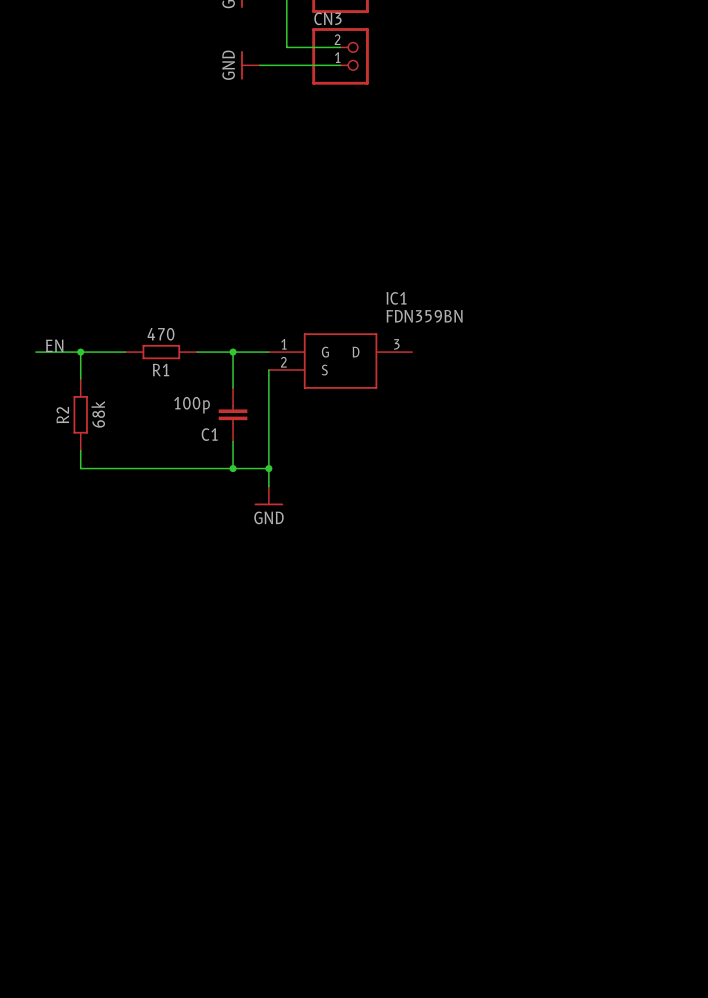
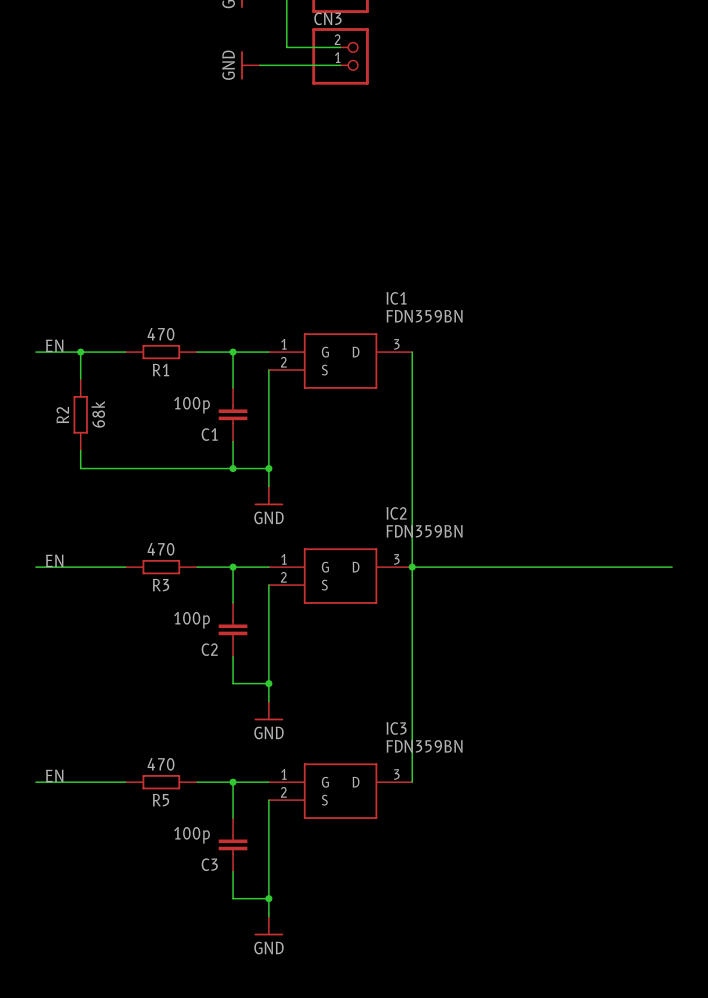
wire: none -> (412, 352) (412, 782)
label: none -> EN (54, 560)
wire: none -> (35, 567) (125, 567)
R3: none -> 470 (161, 567)
wire: none -> (197, 567) (268, 567)
wire: none -> (233, 567) (233, 602)
junction: none -> (233, 567)
wire: none -> (412, 567) (672, 567)
junction: none -> (412, 567)
IC2: none -> FDN359BN (340, 576)
wire: none -> (268, 585) (268, 701)
C2: none -> 100p (233, 629)
wire: none -> (233, 656) (233, 683) (268, 683)
junction: none -> (268, 683)
power symbol: none -> GND (268, 710)
label: none -> EN (54, 775)
wire: none -> (35, 782) (125, 782)
R5: none -> 470 (161, 782)
wire: none -> (197, 782) (268, 782)
wire: none -> (233, 782) (233, 818)
junction: none -> (233, 782)
IC3: none -> FDN359BN (340, 791)
wire: none -> (268, 800) (268, 916)
C3: none -> 100p (233, 844)
wire: none -> (233, 871) (233, 898) (268, 898)
junction: none -> (268, 898)
power symbol: none -> GND (268, 926)

